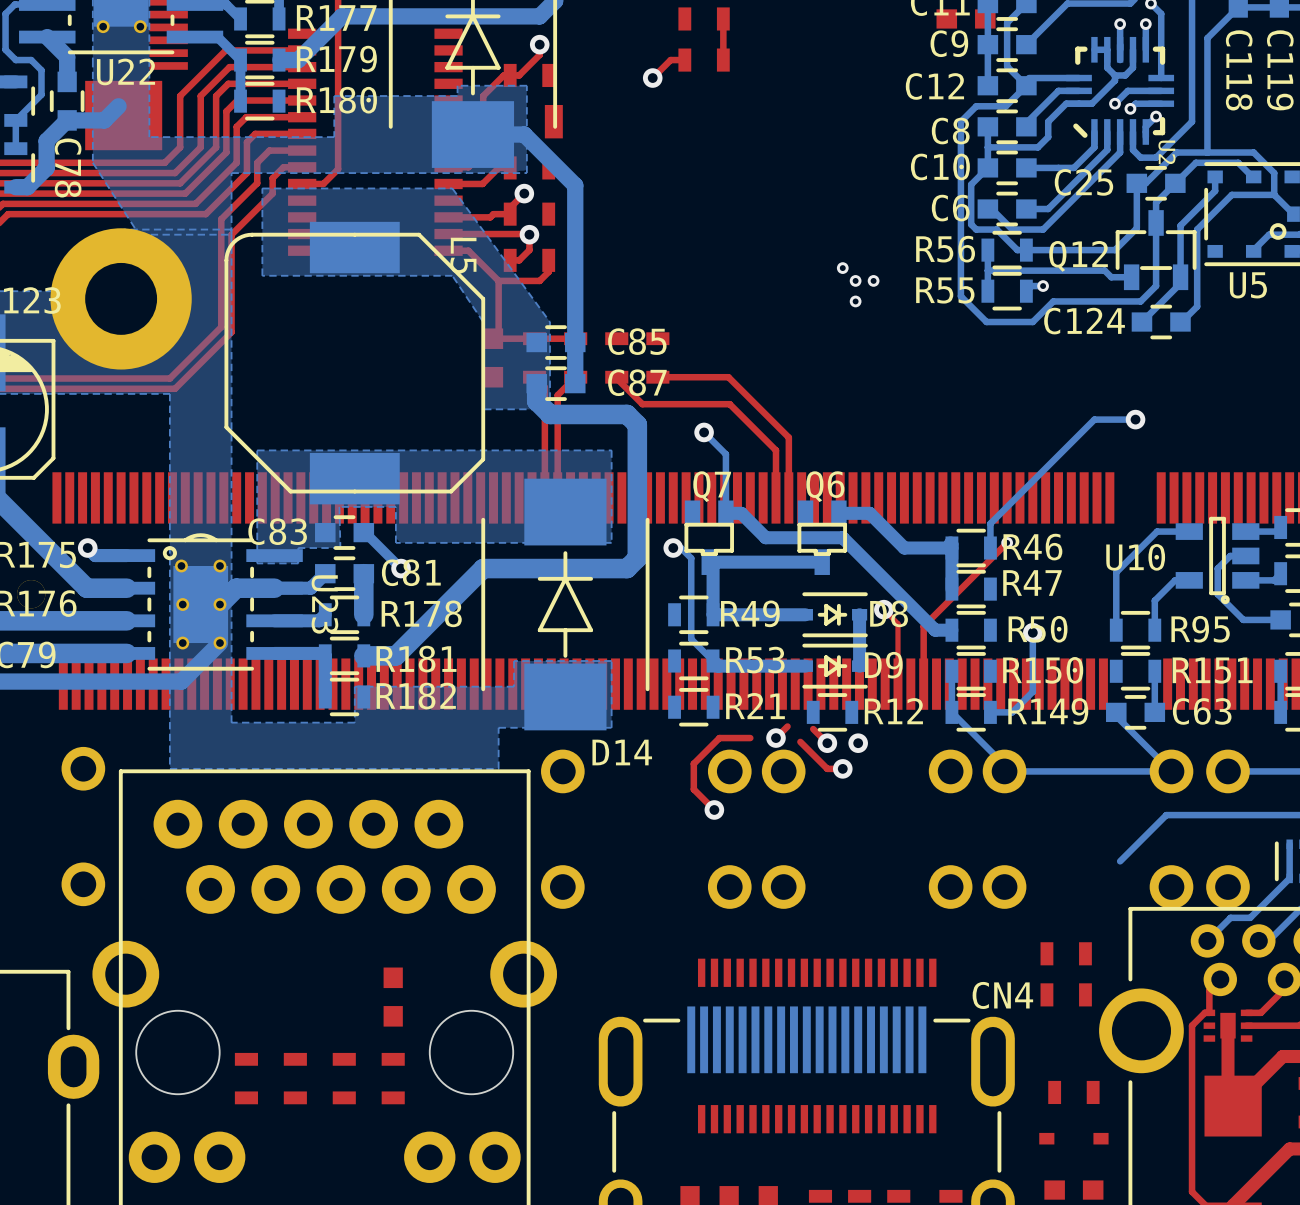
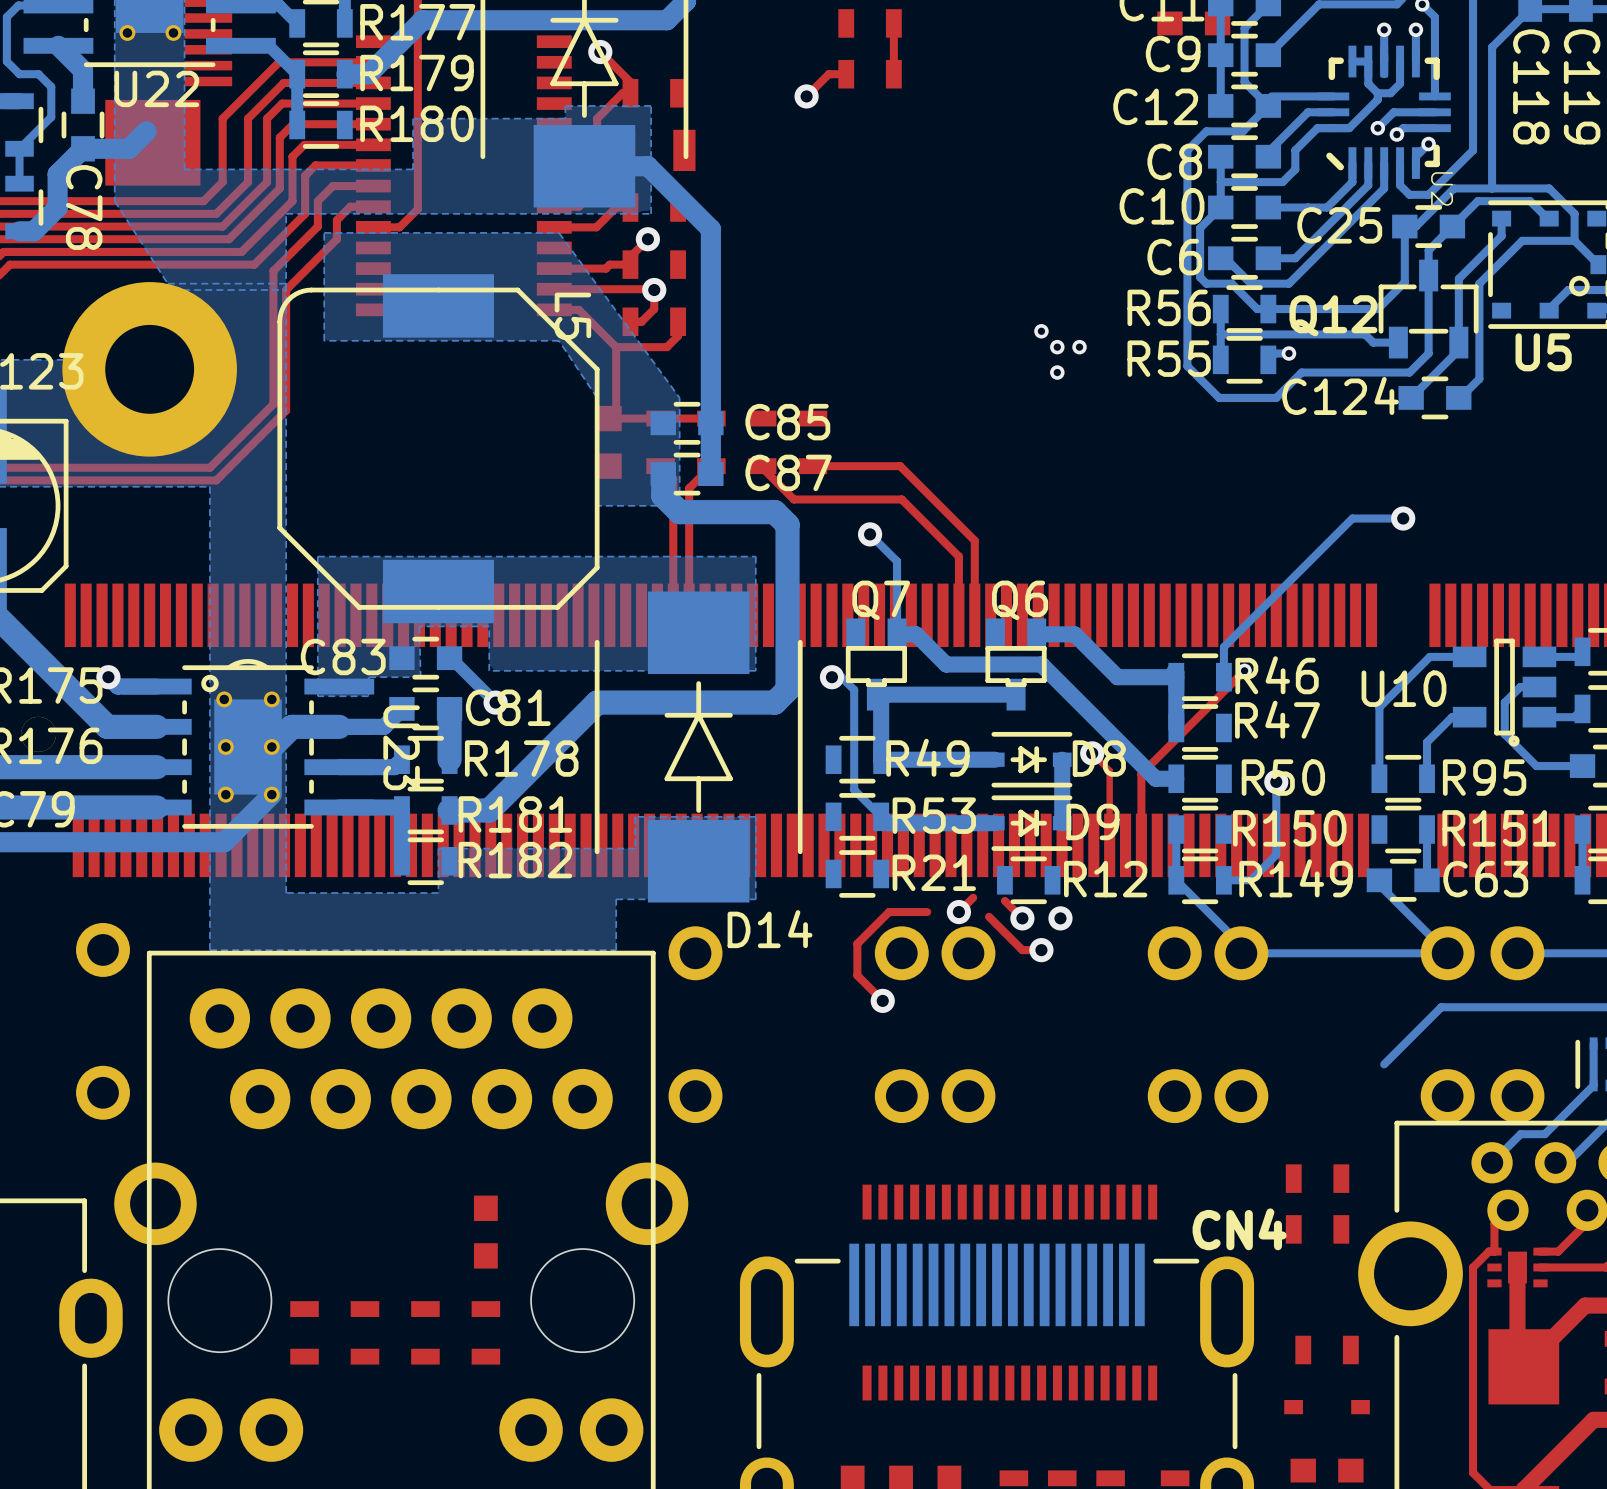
top track: (539, 44) (539, 54) (519, 75) (510, 75) -> (600, 52) (630, 82) (630, 93)
via position: (539, 44) -> (600, 52)

